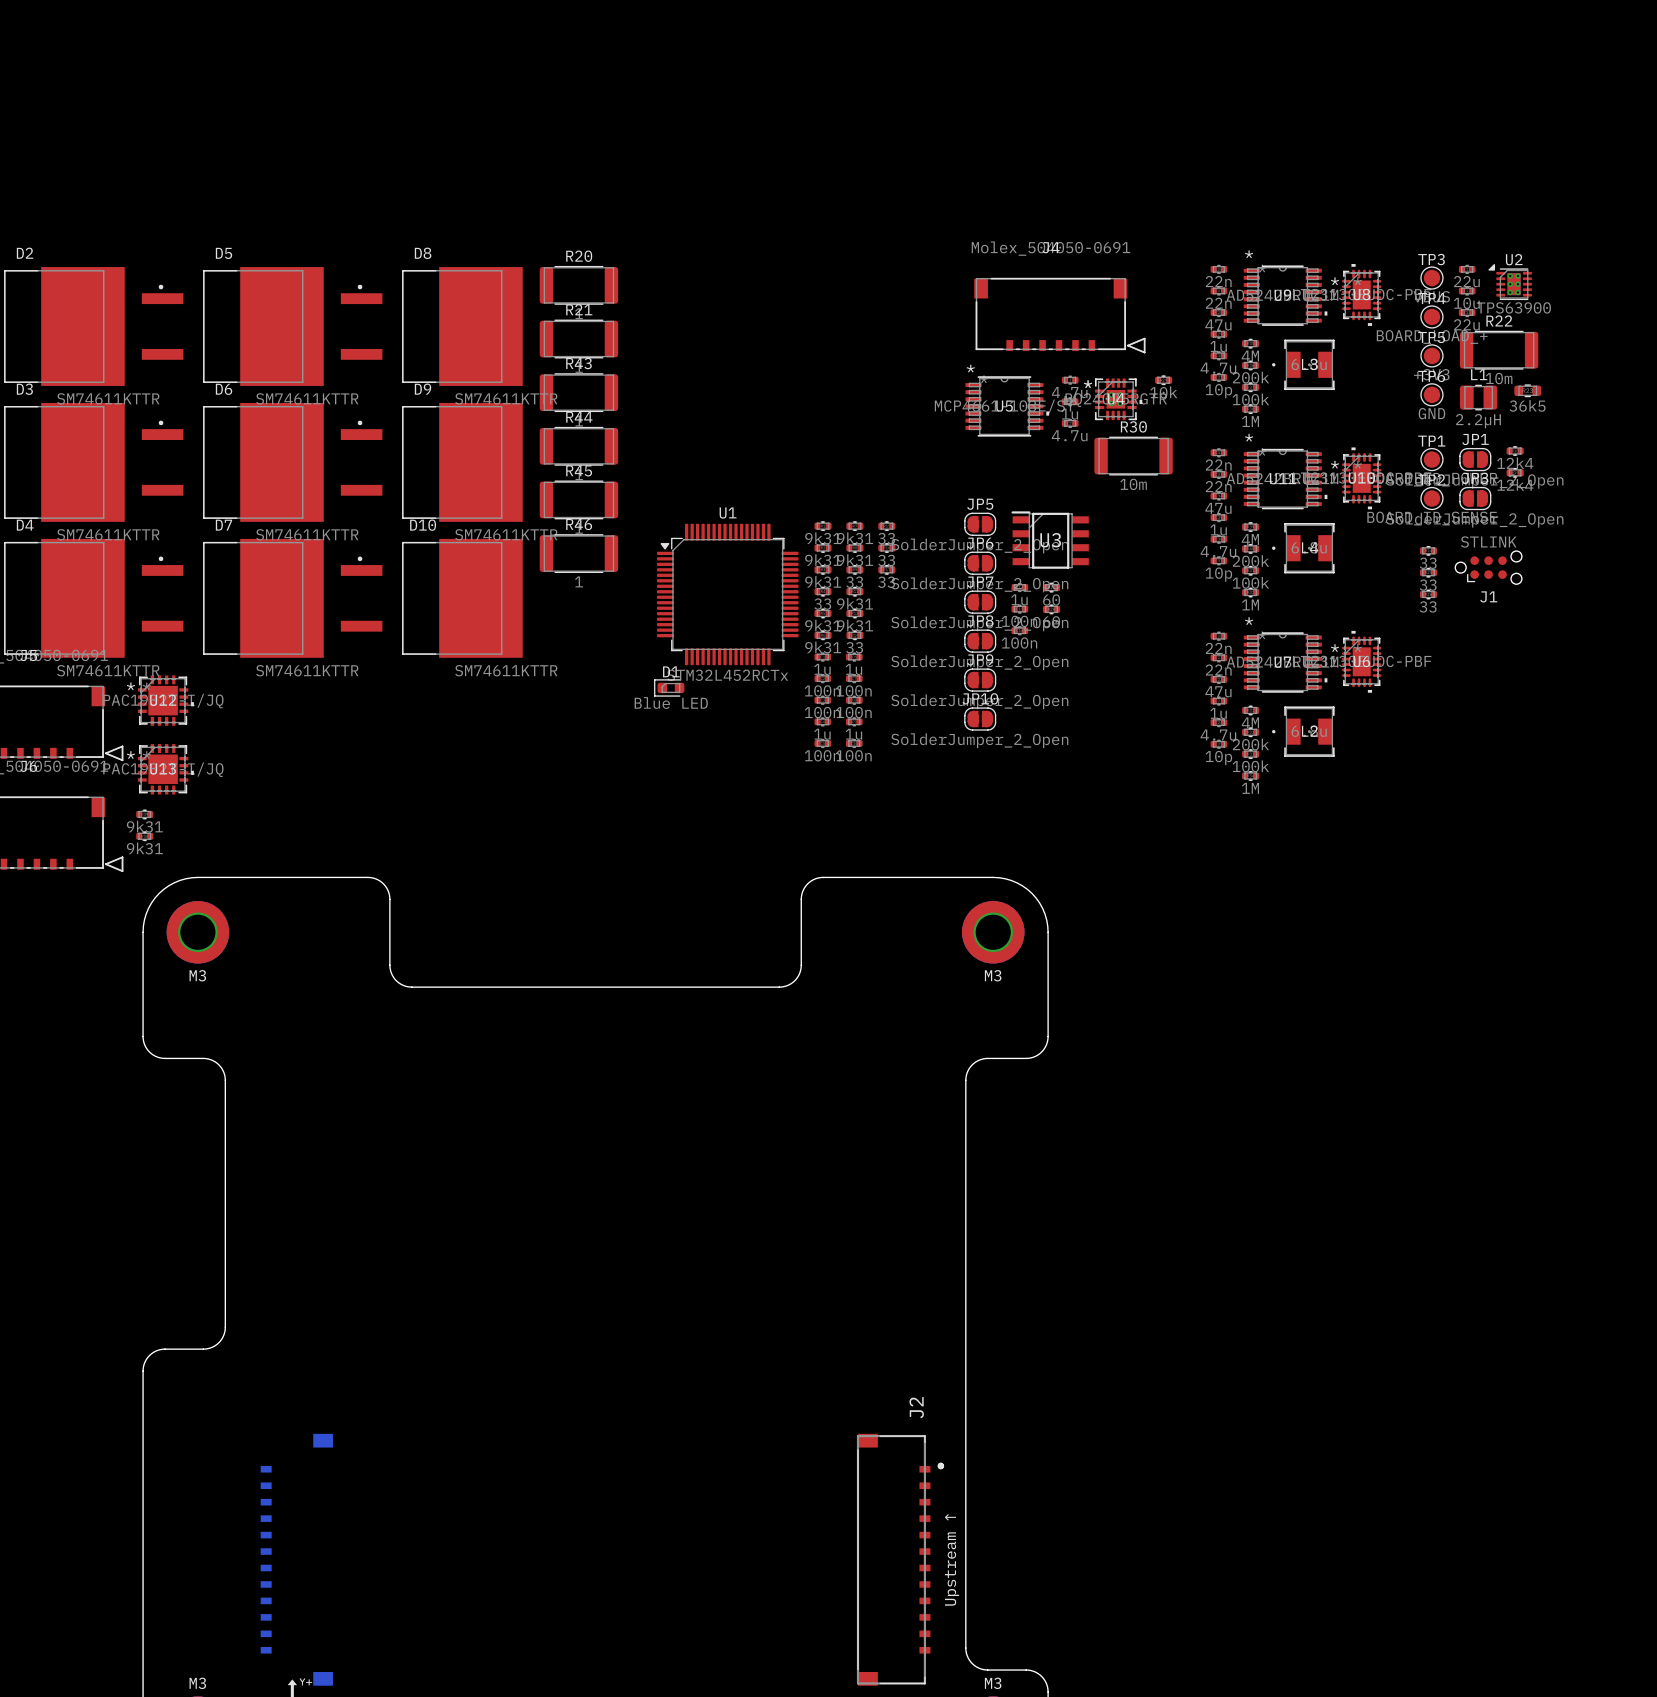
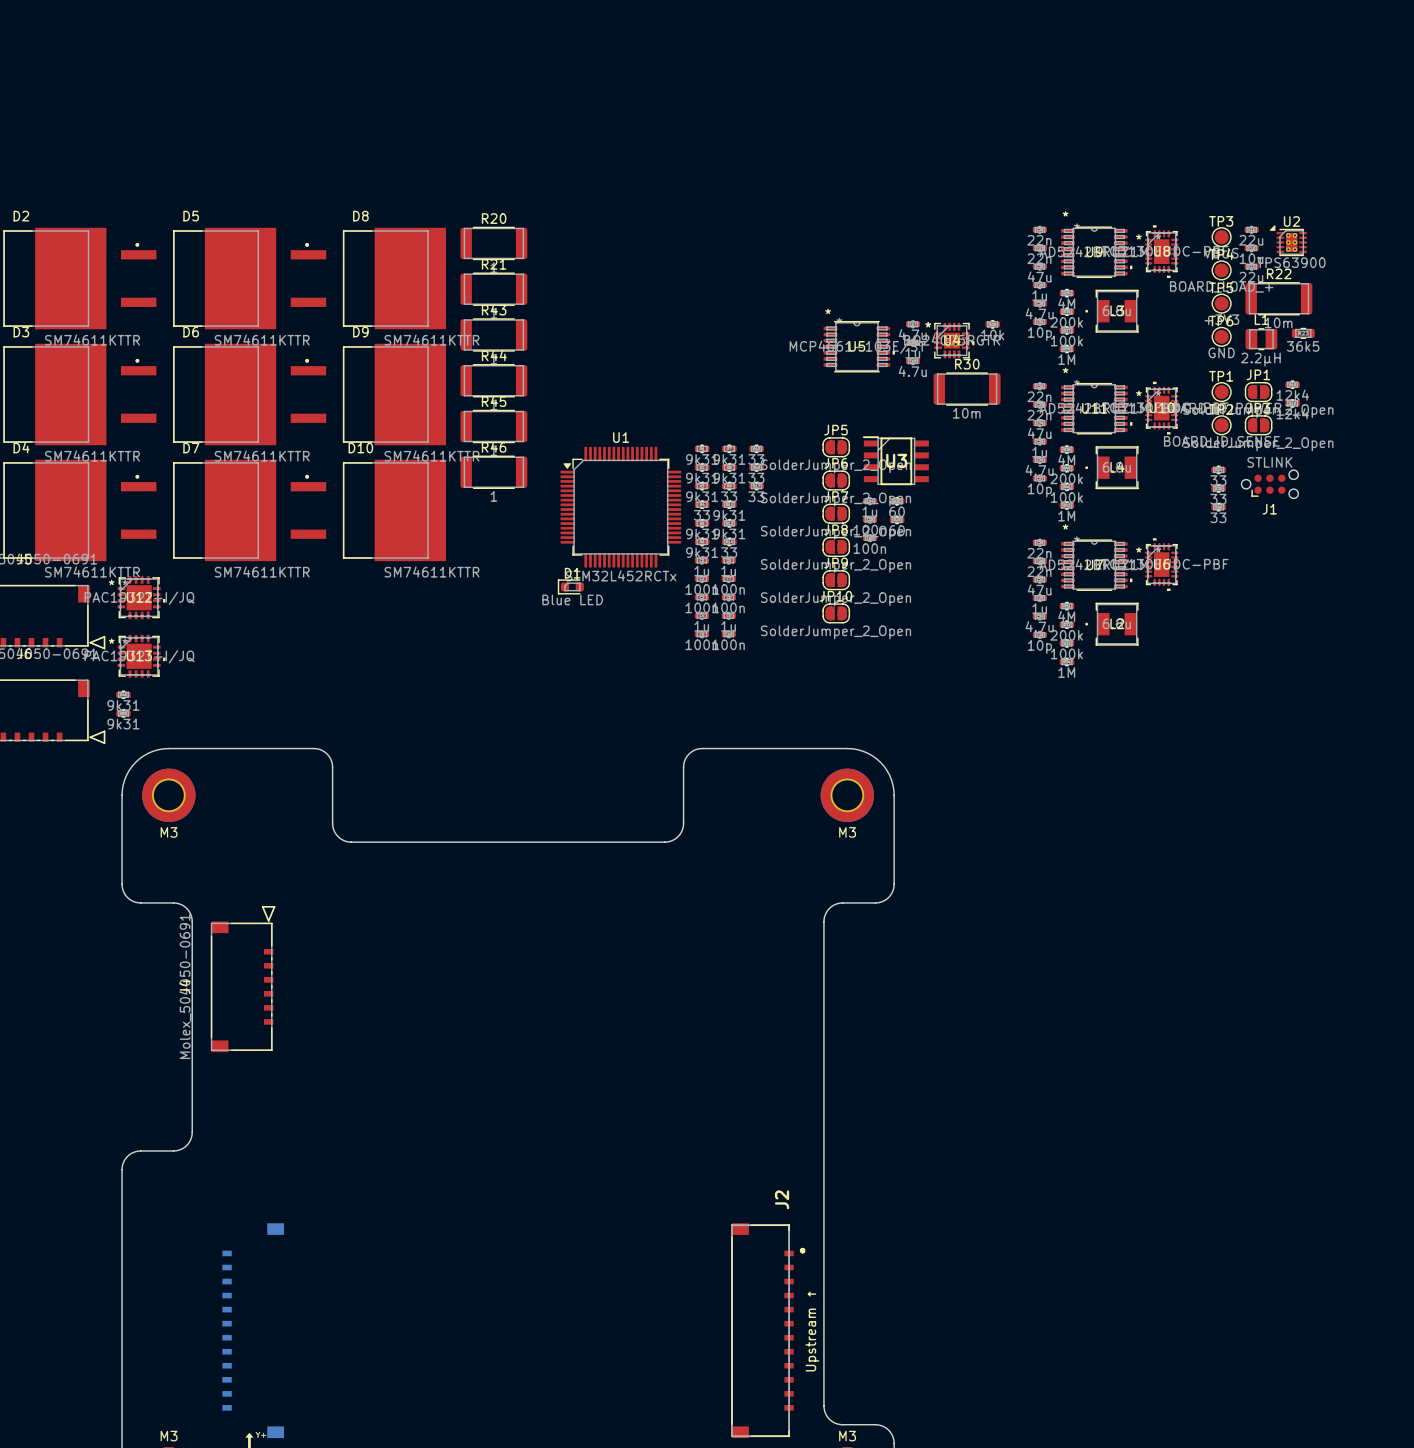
J4 rotation: 0° (1059, 315) -> 90° counterclockwise (243, 979)
J4 position: (1059, 315) -> (243, 979)

